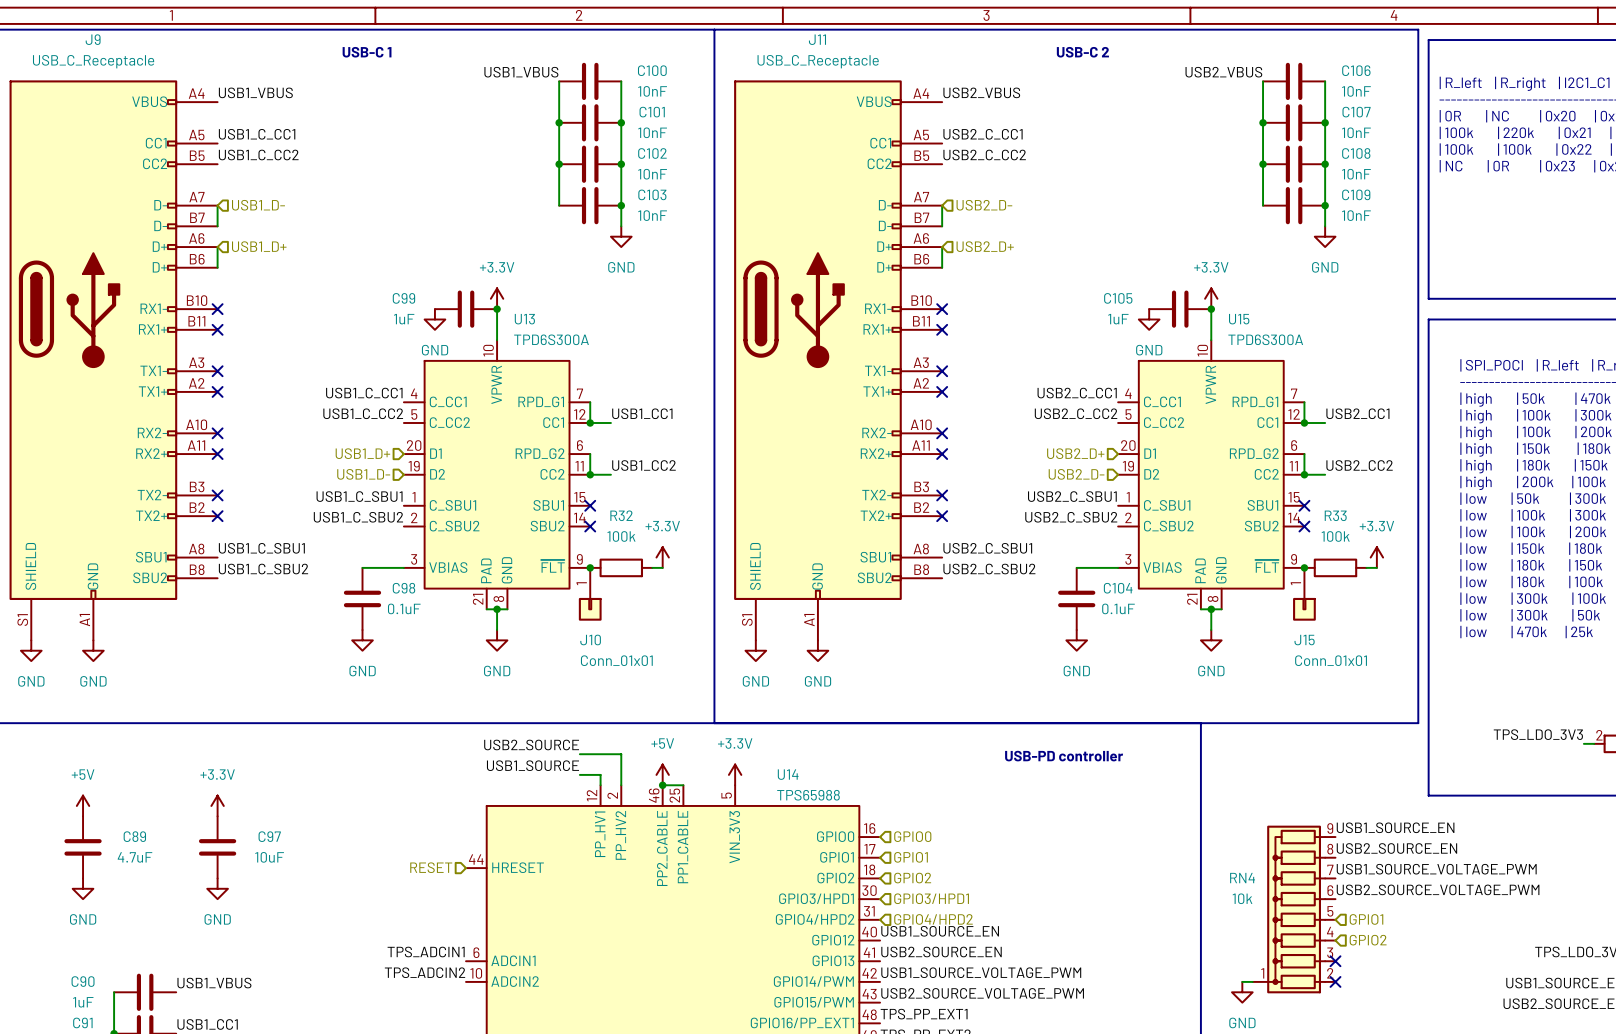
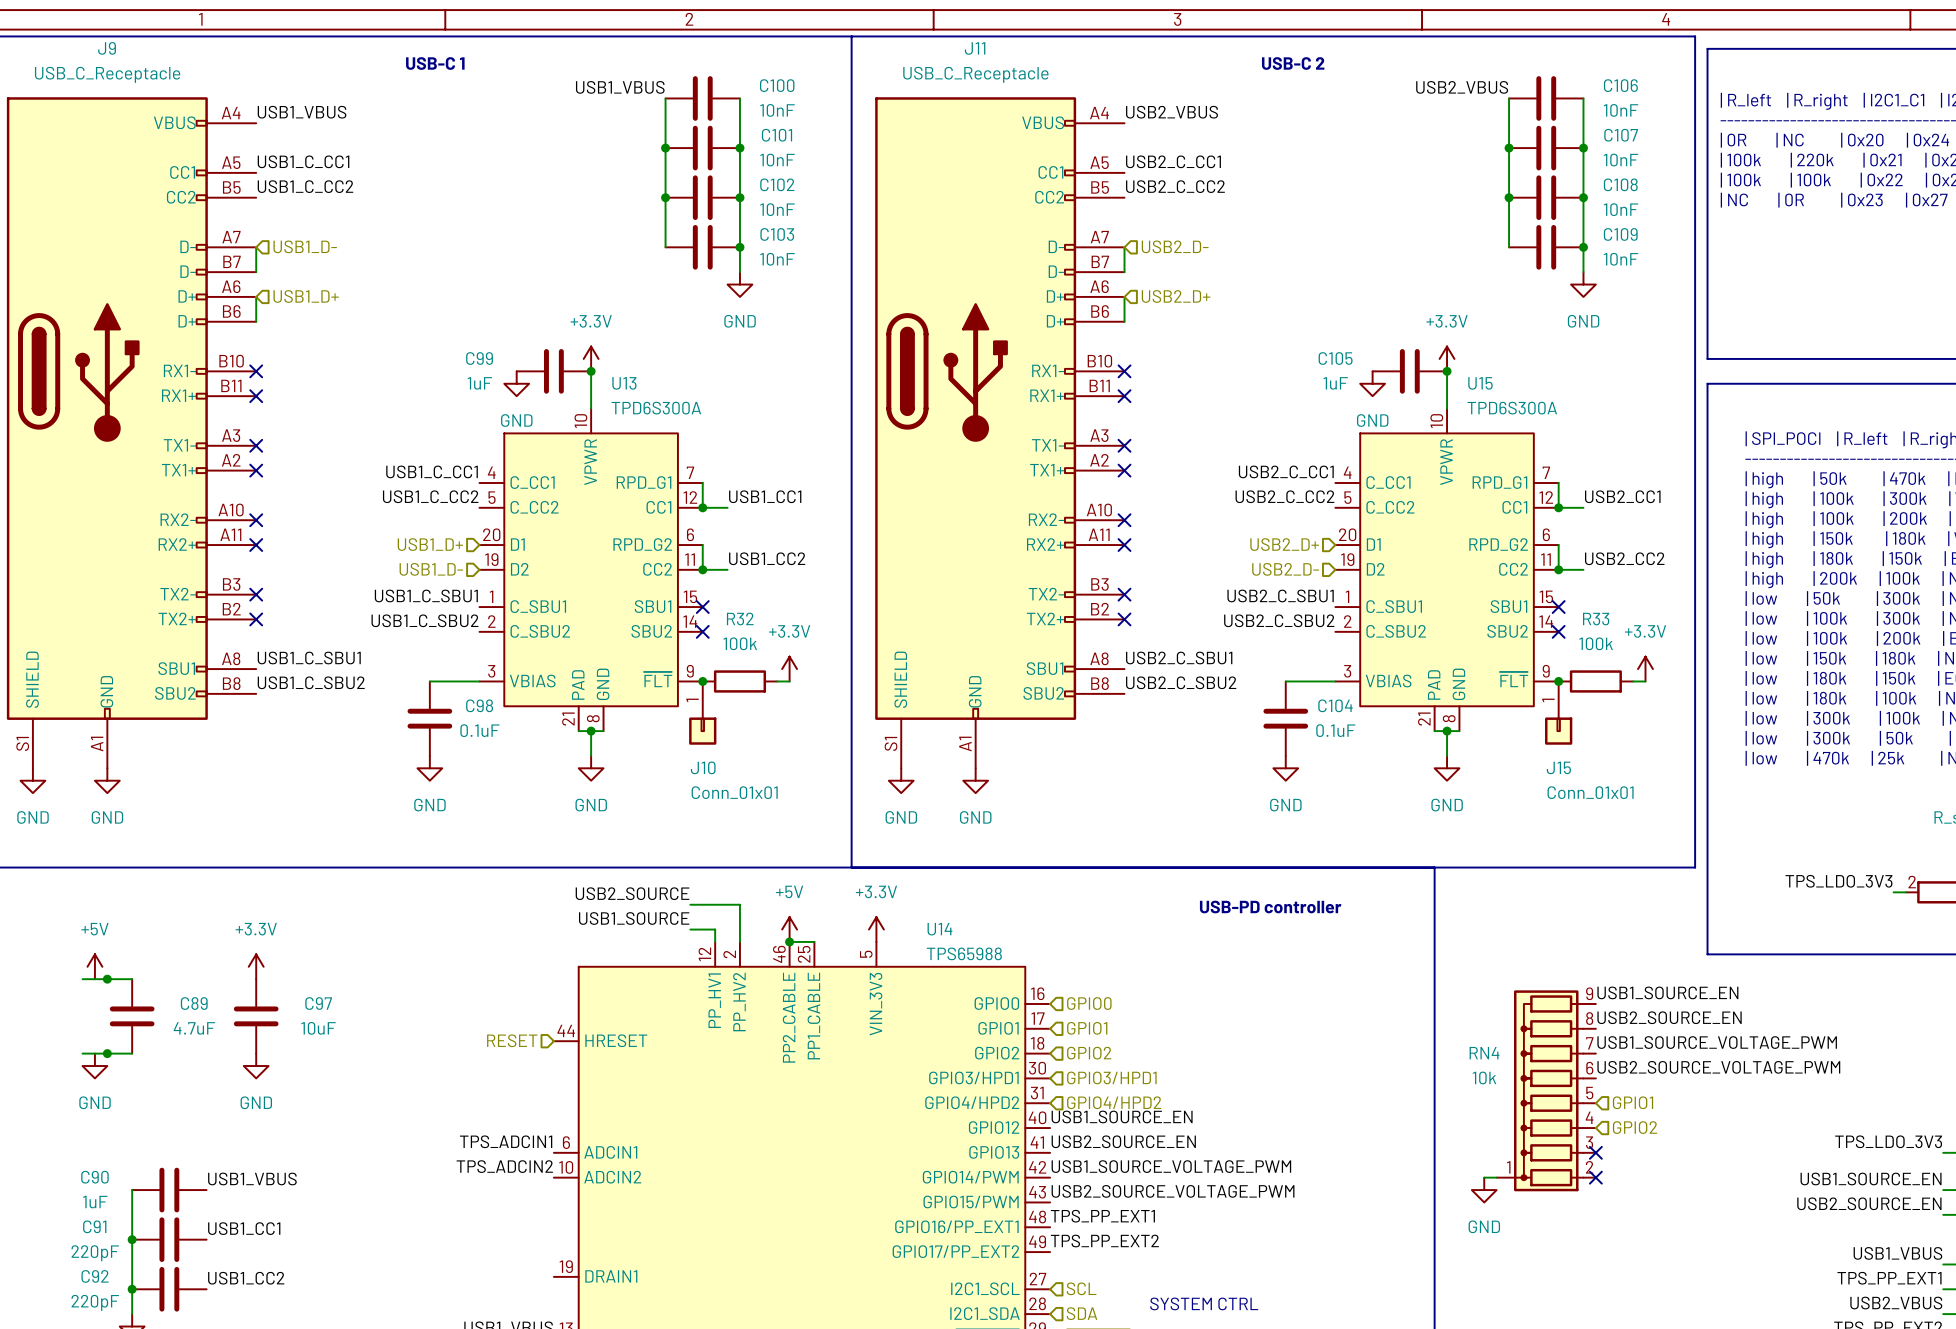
wire: none -> (82, 979) (132, 979)
junction: none -> (107, 979)
C89 position: (83, 847) -> (132, 1016)
wire: none -> (82, 1053) (132, 1053)
junction: none -> (107, 1053)

